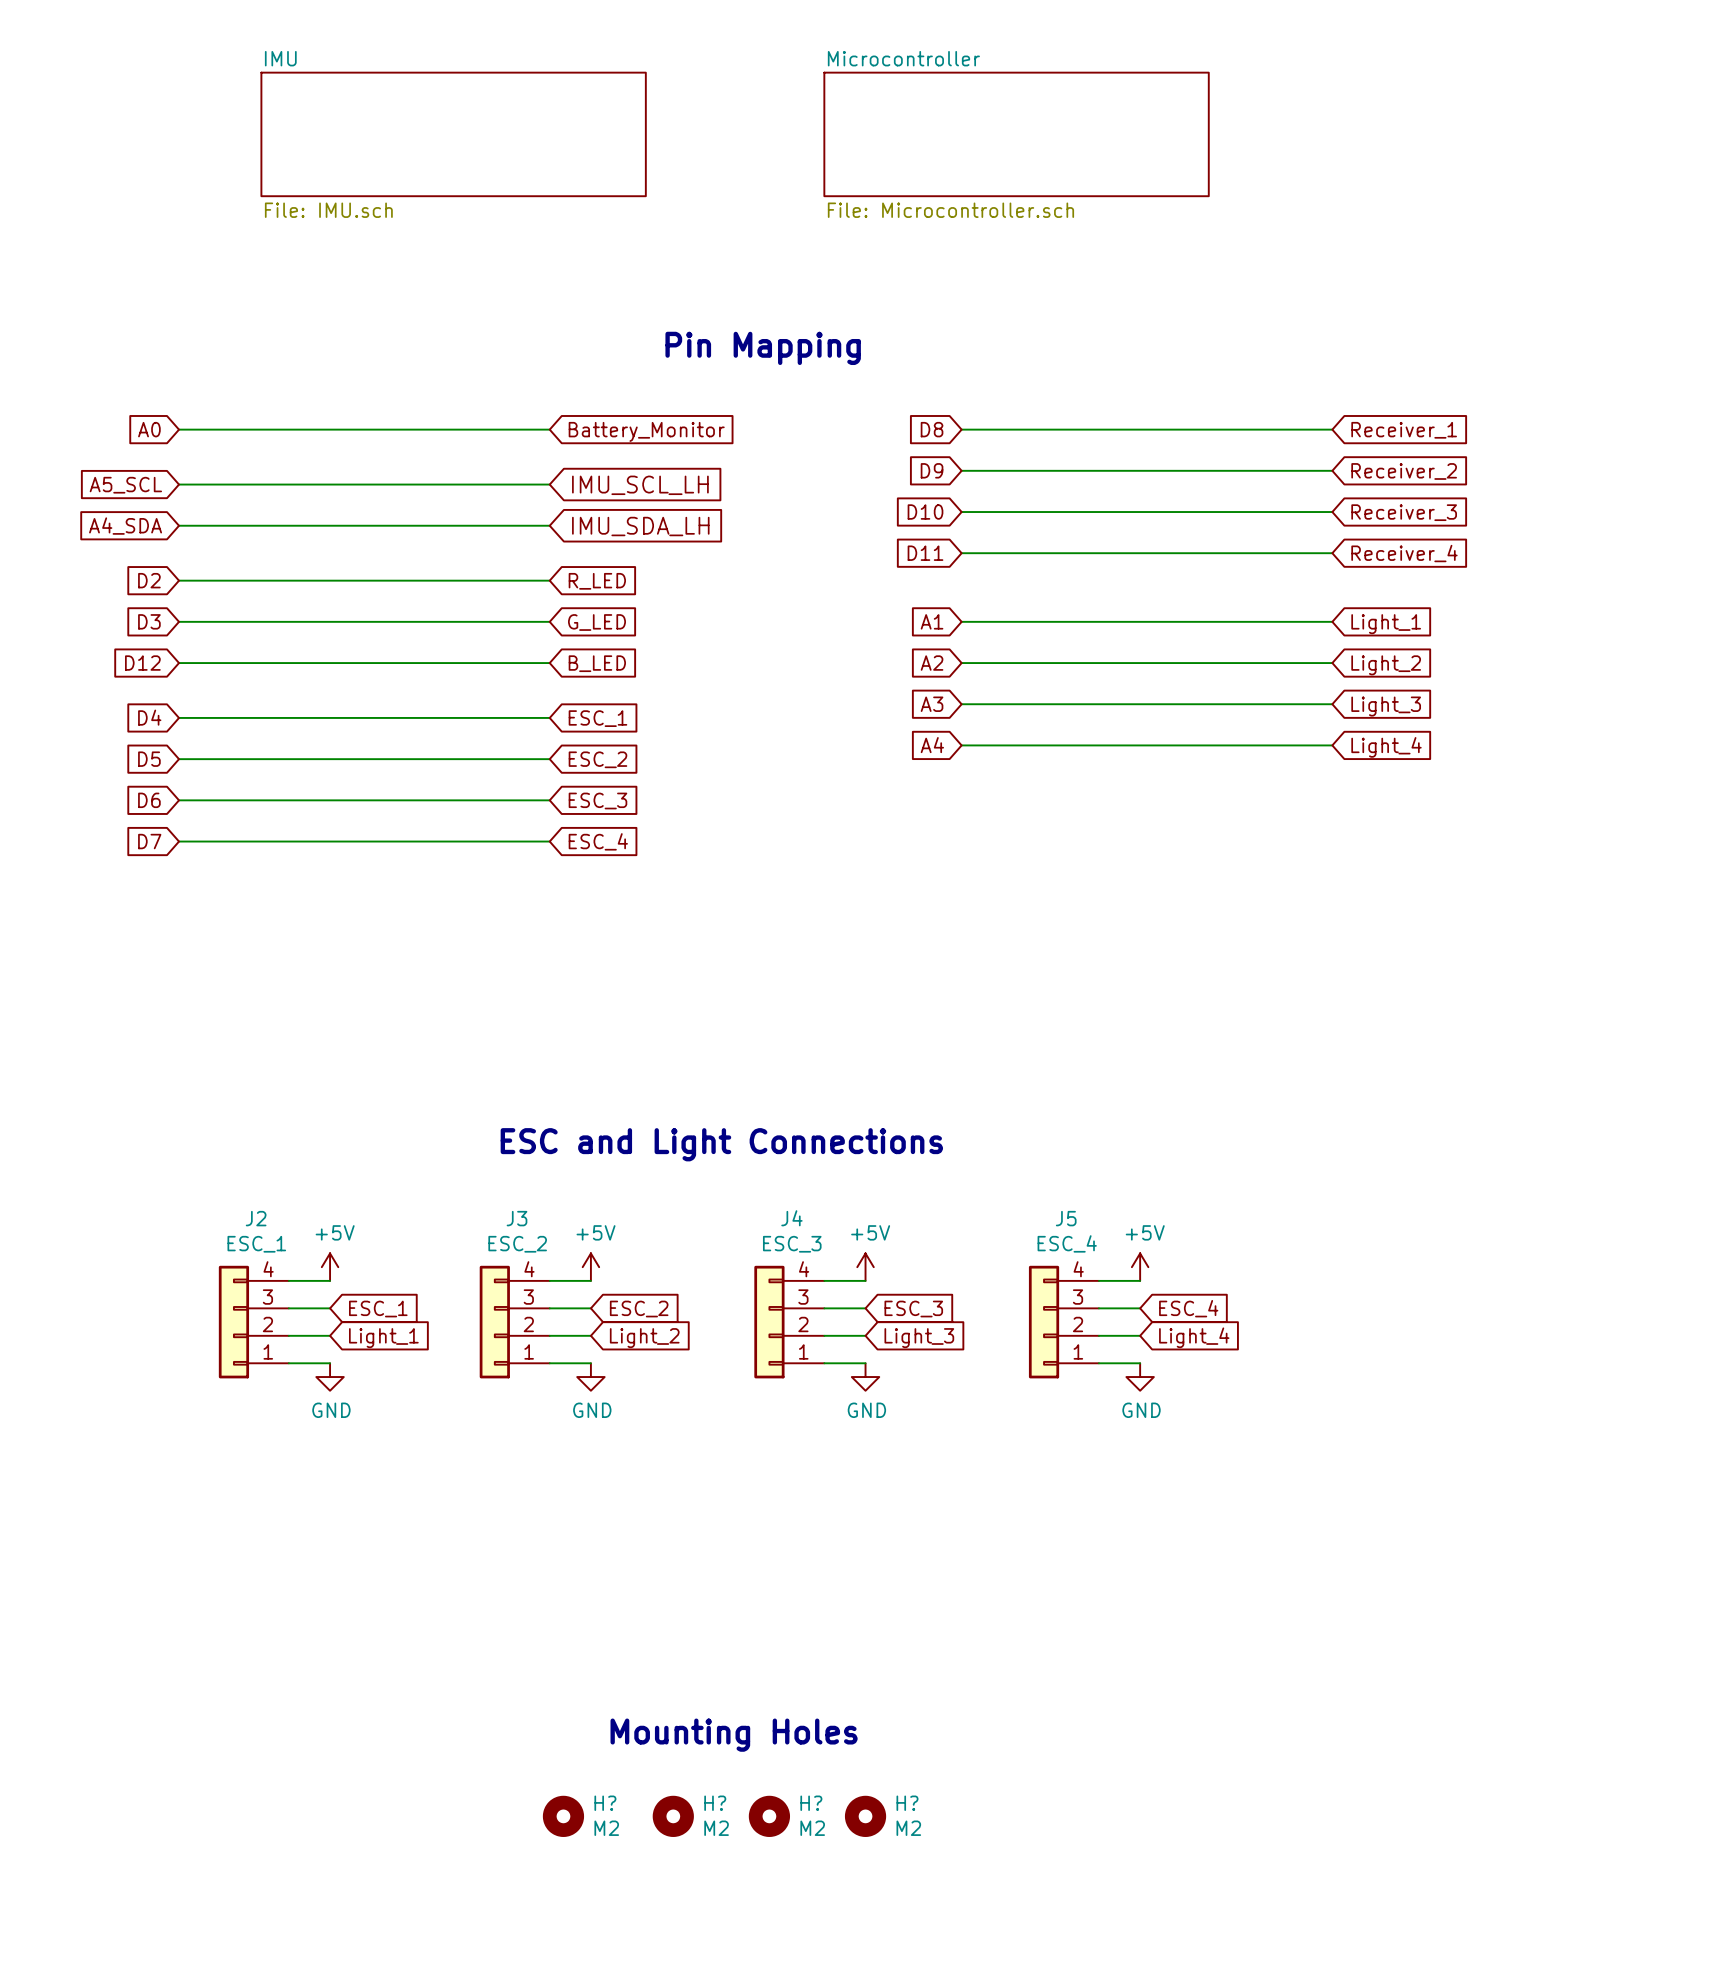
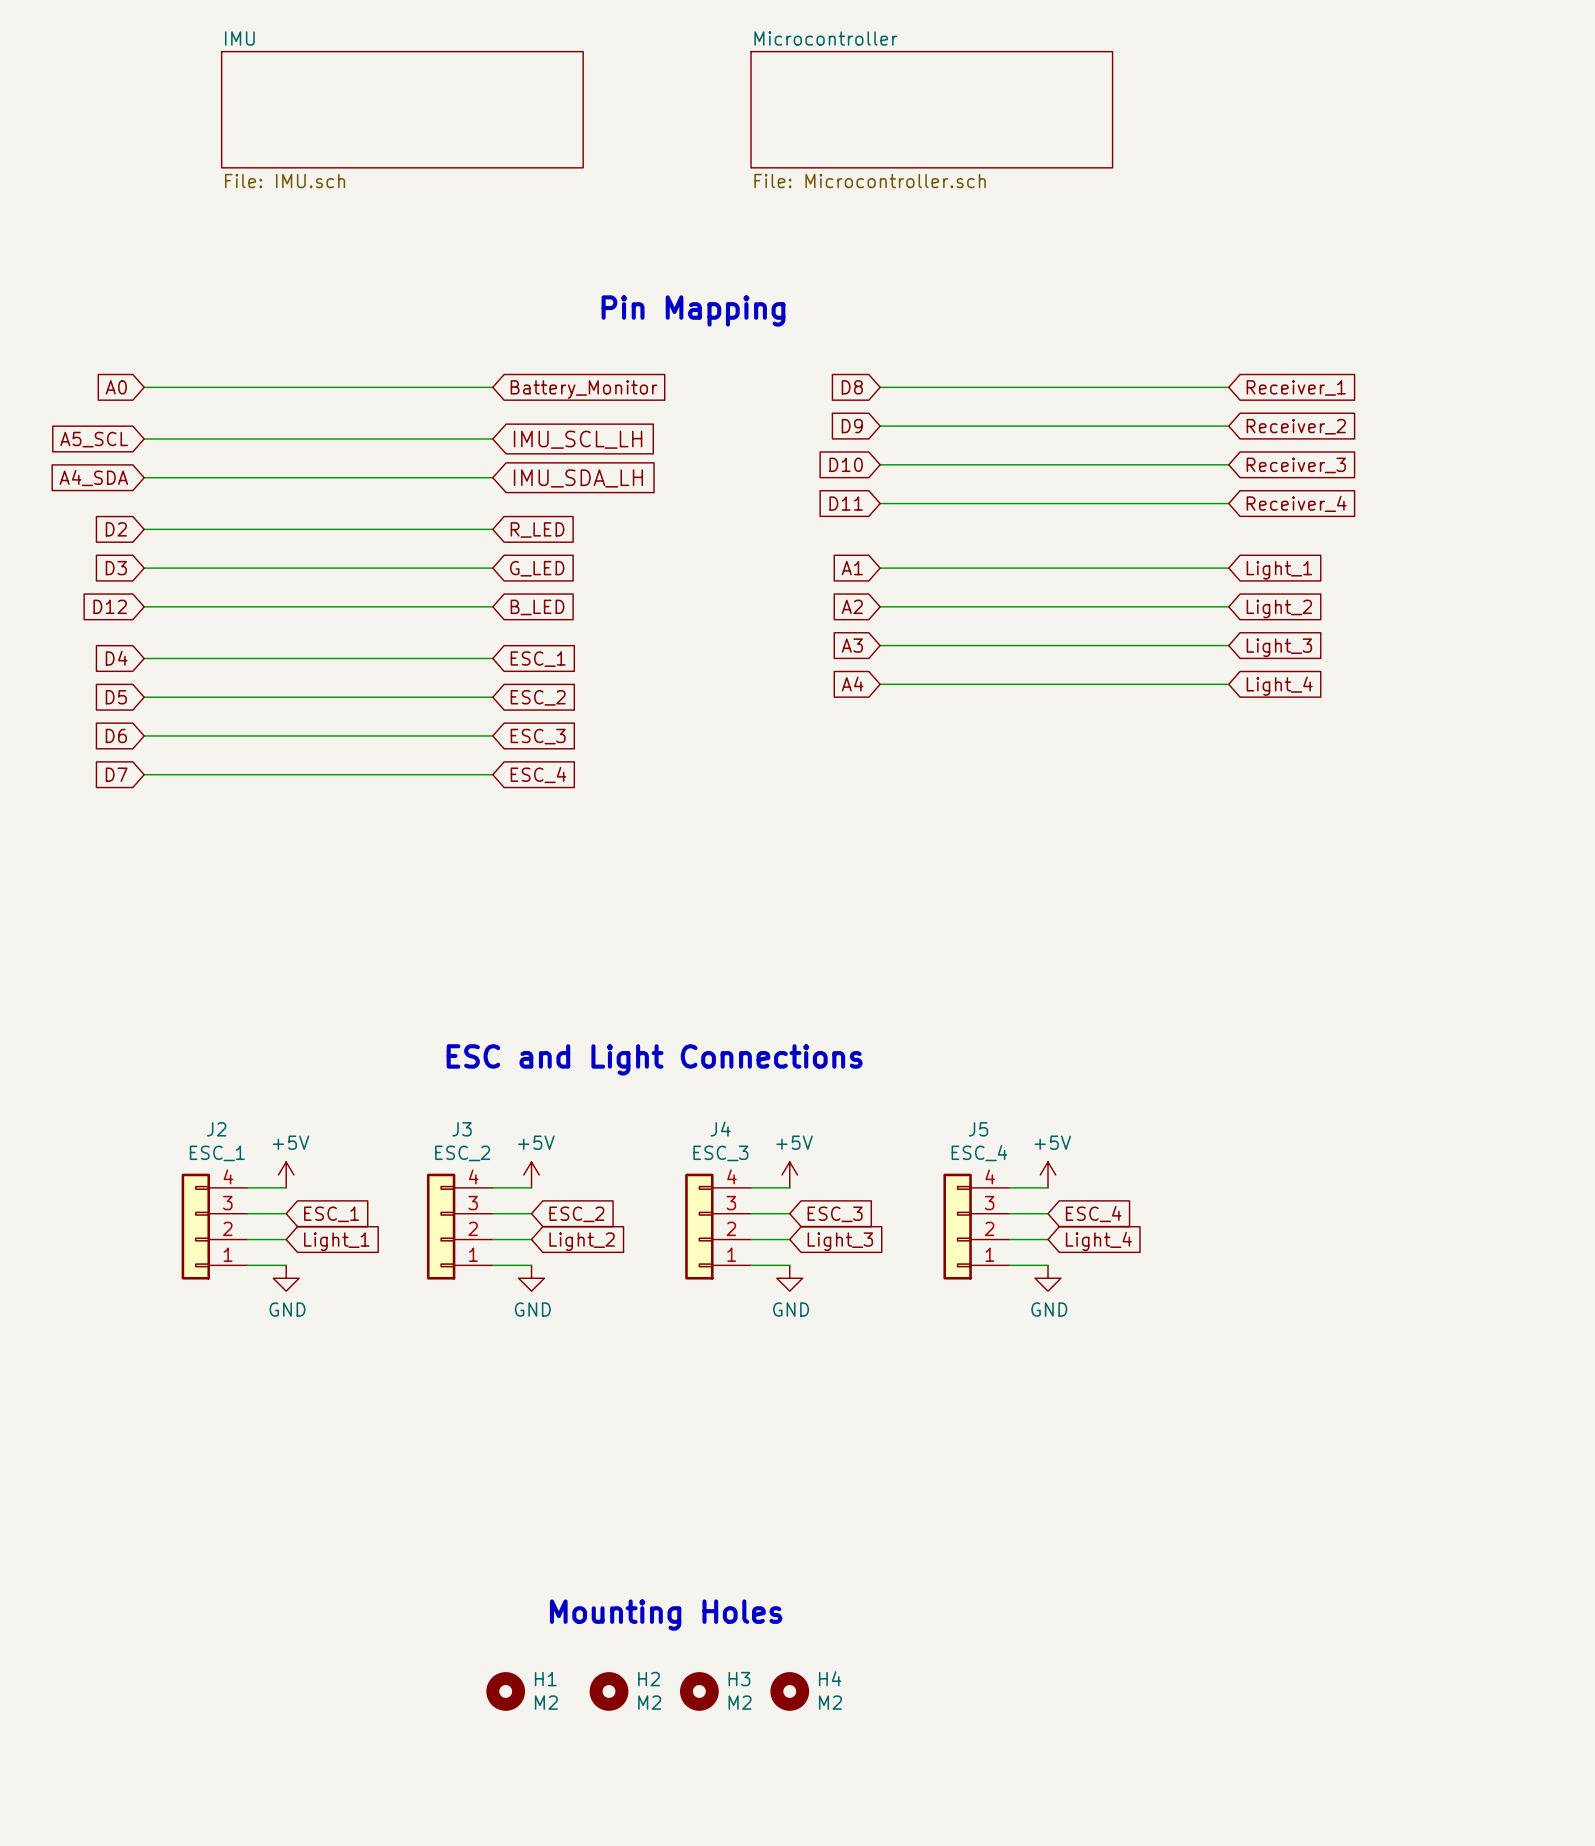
H? name: H? (605, 1803) -> H1 (545, 1679)
H? name: H? (715, 1803) -> H2 (649, 1679)
H? name: H? (811, 1803) -> H3 (739, 1679)
H? name: H? (907, 1803) -> H4 (830, 1678)

